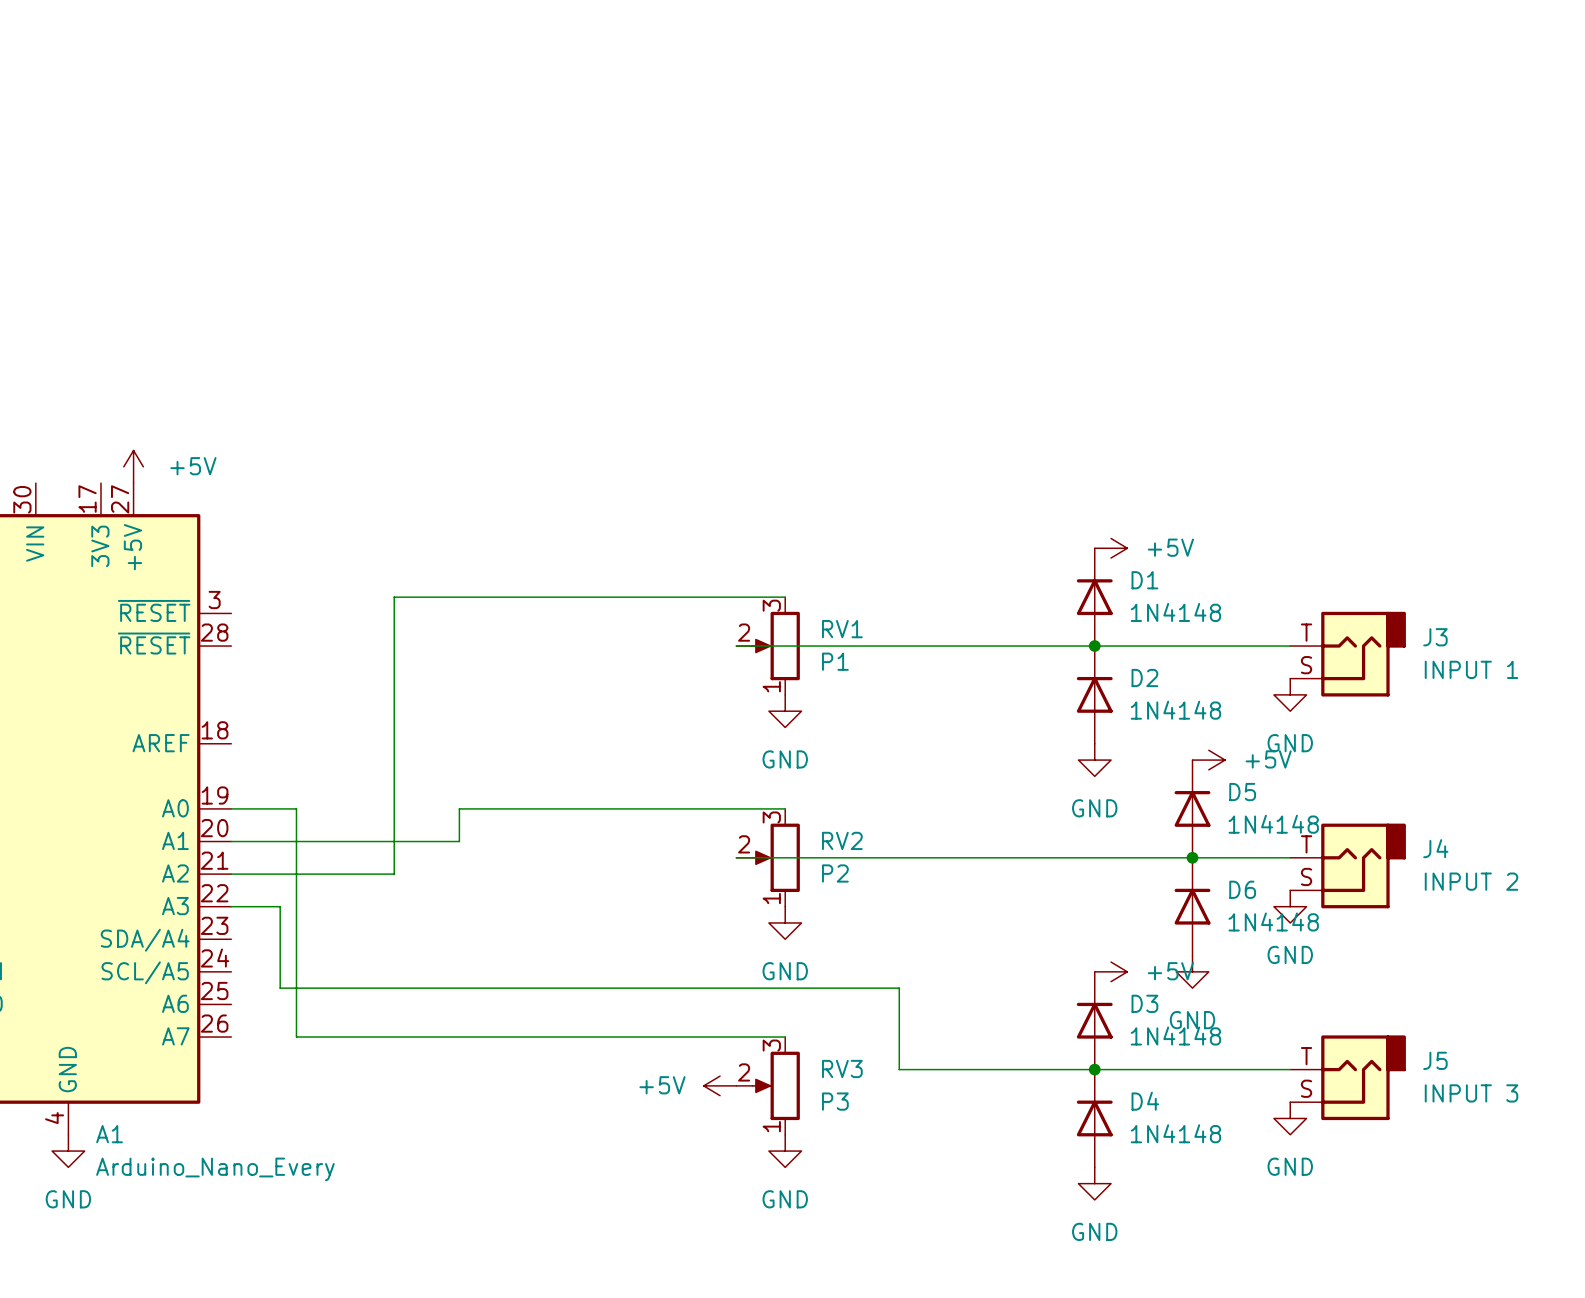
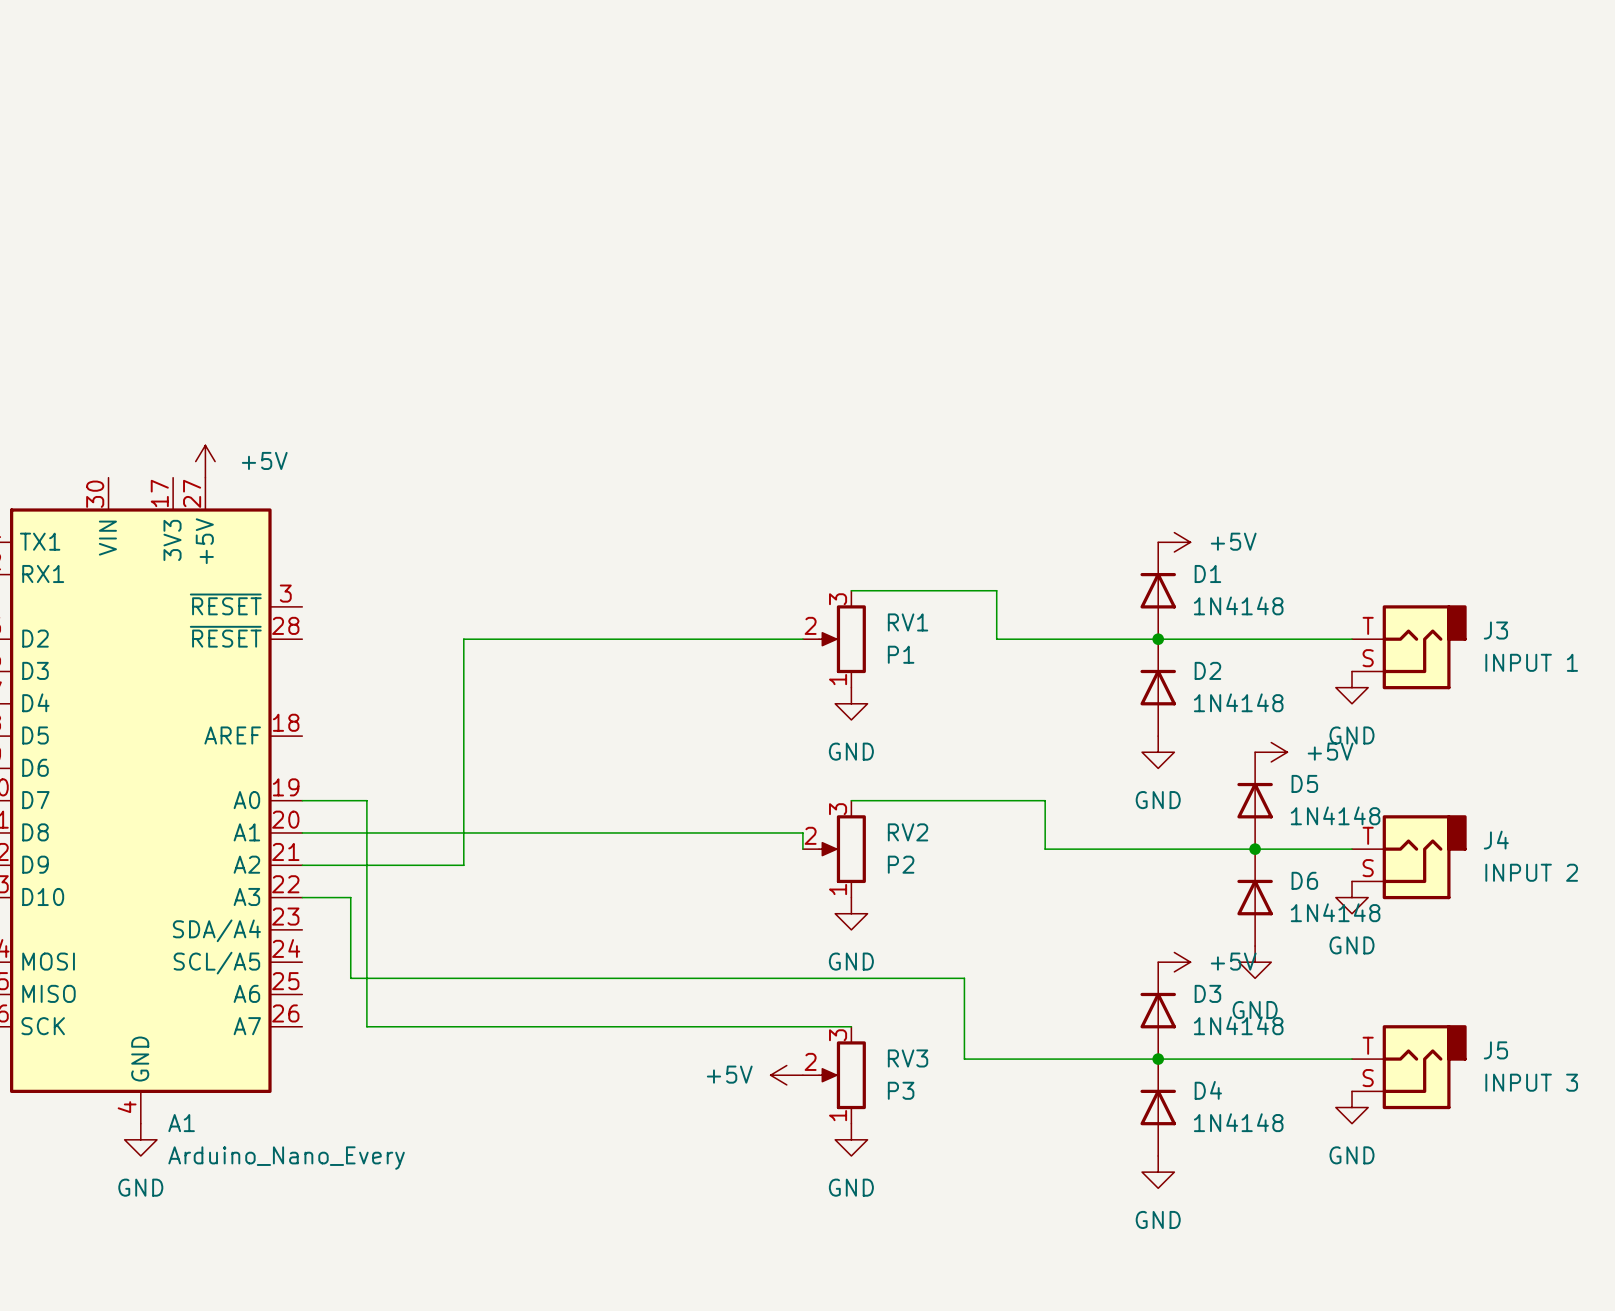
wire: (785, 597) (394, 597) (394, 646) -> (802, 639) (463, 639)
wire: (736, 646) (931, 646) -> (851, 590) (996, 590) (996, 639)
wire: (785, 808) (459, 808) (459, 841) -> (802, 849) (802, 832) (528, 832)
wire: (736, 857) (980, 857) -> (851, 800) (1045, 800) (1045, 849)

